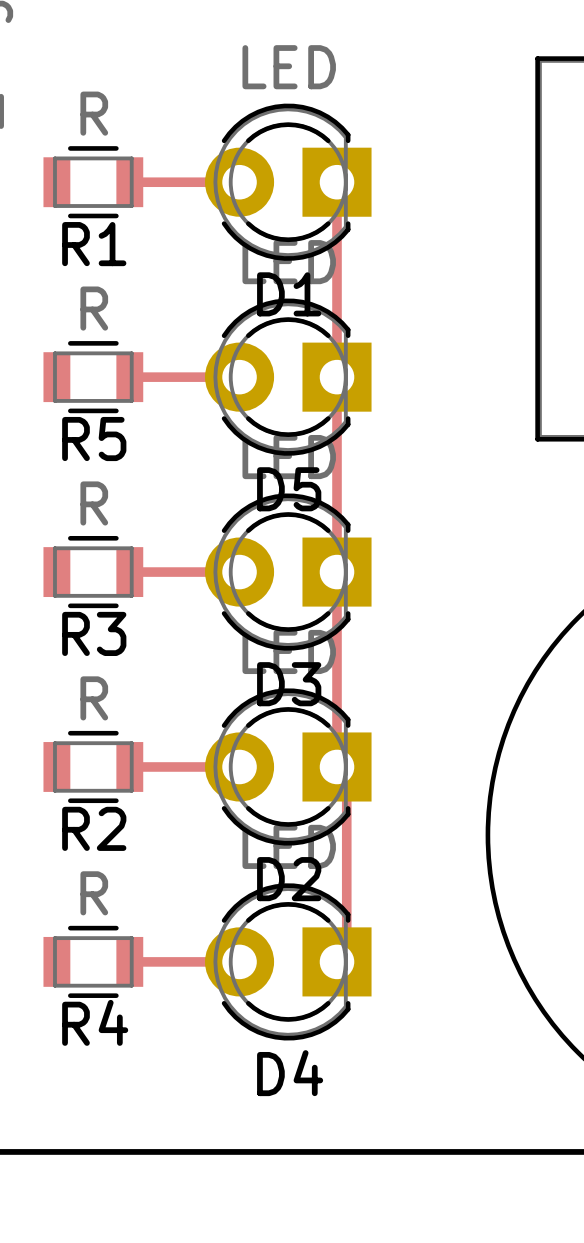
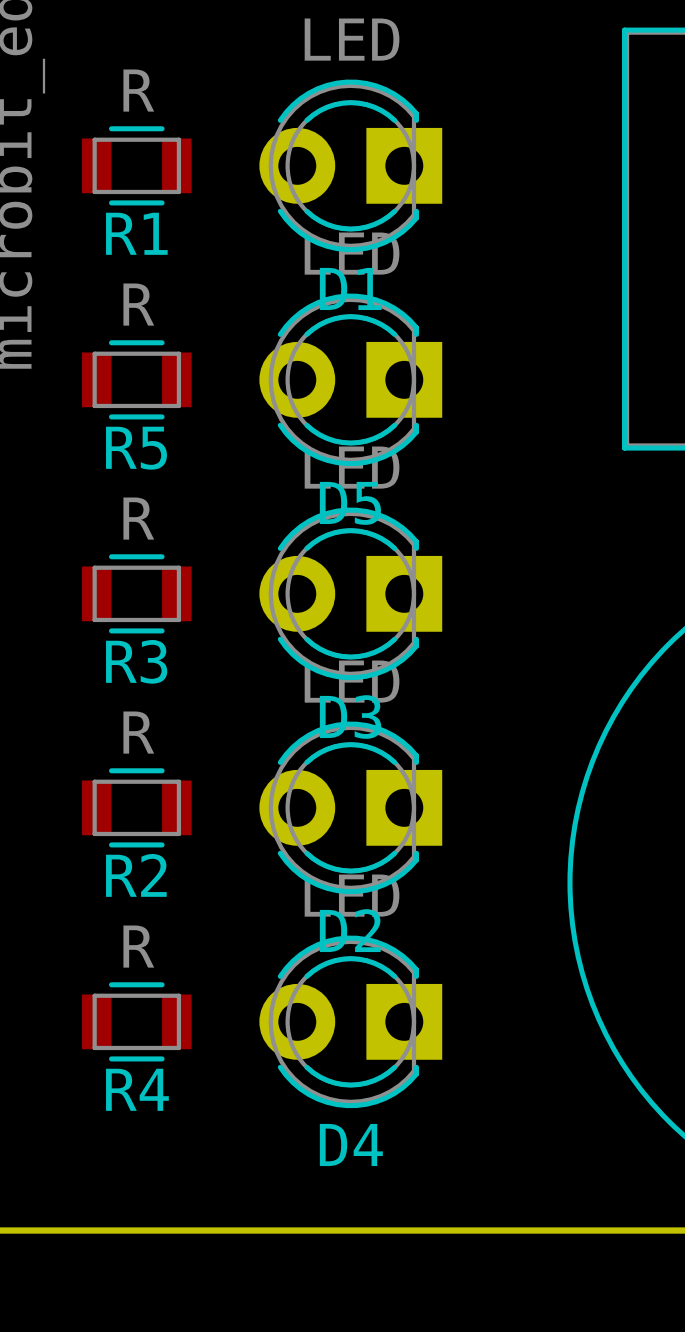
track: (129, 182) (239, 182) -> none
track: (337, 182) (337, 766) (346, 776) (346, 952) (337, 961) -> none
track: (129, 377) (239, 377) -> none
track: (129, 572) (239, 572) -> none
track: (129, 766) (239, 766) -> none
track: (129, 961) (239, 961) -> none

